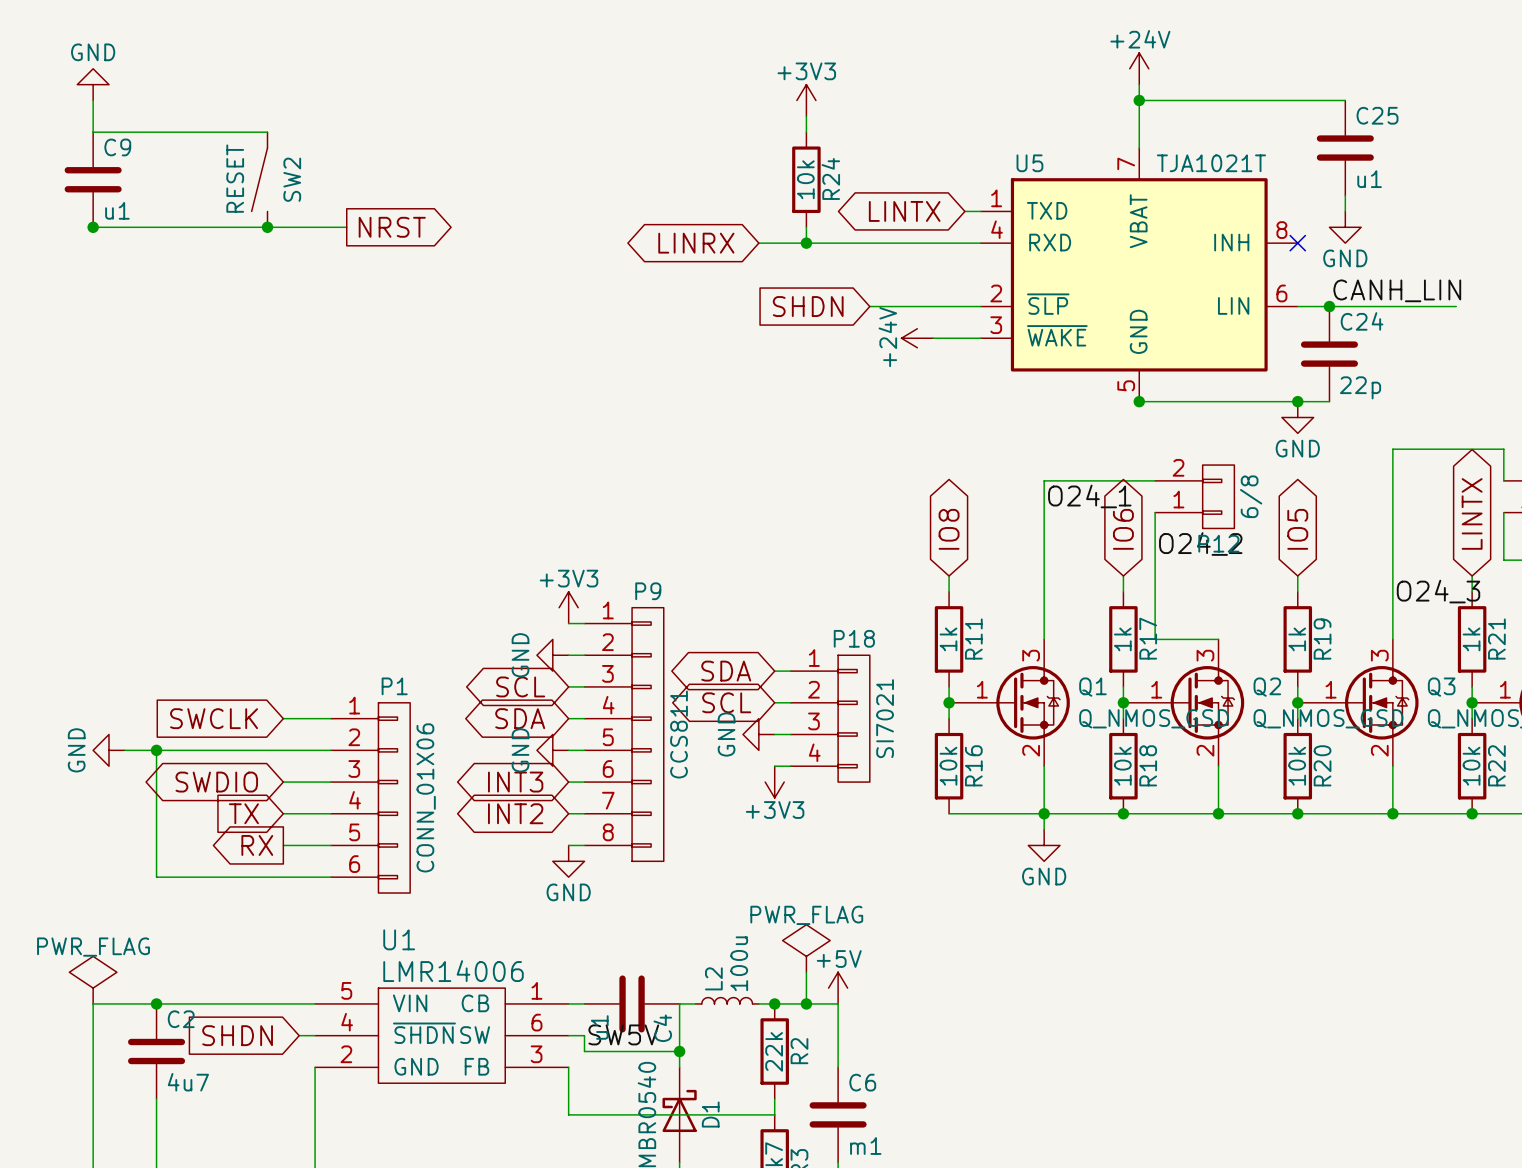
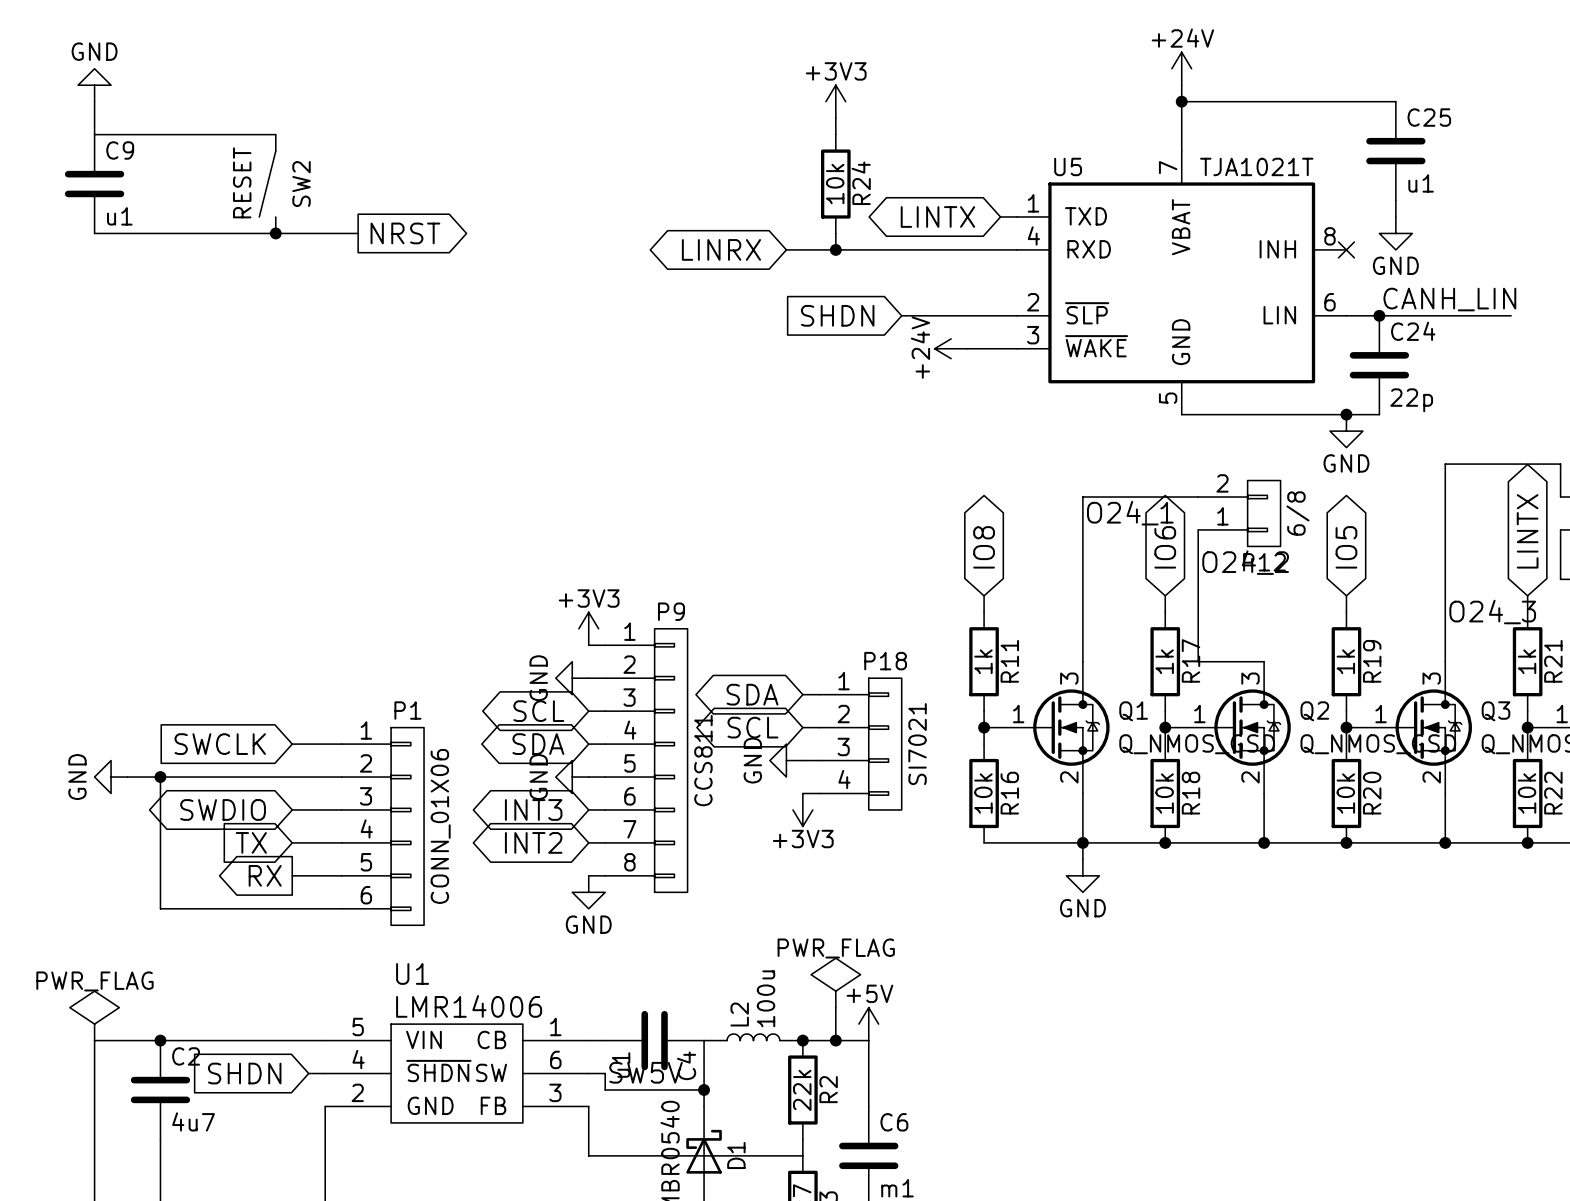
junction: (93, 227) -> none
junction: (1139, 401) -> none

